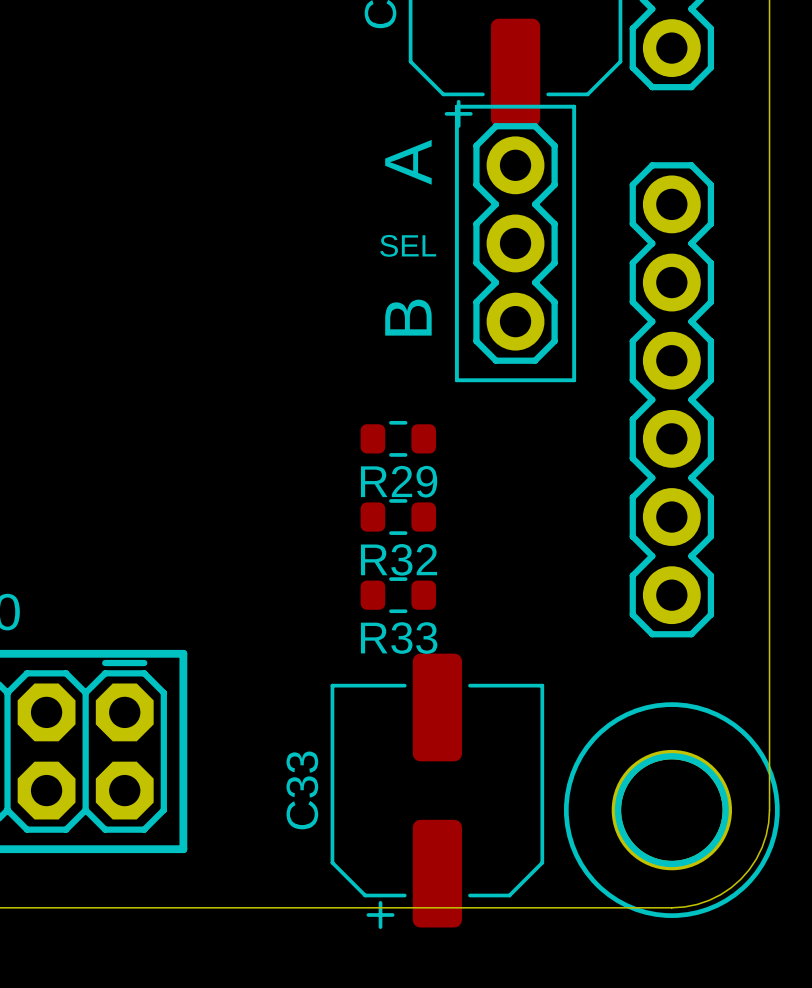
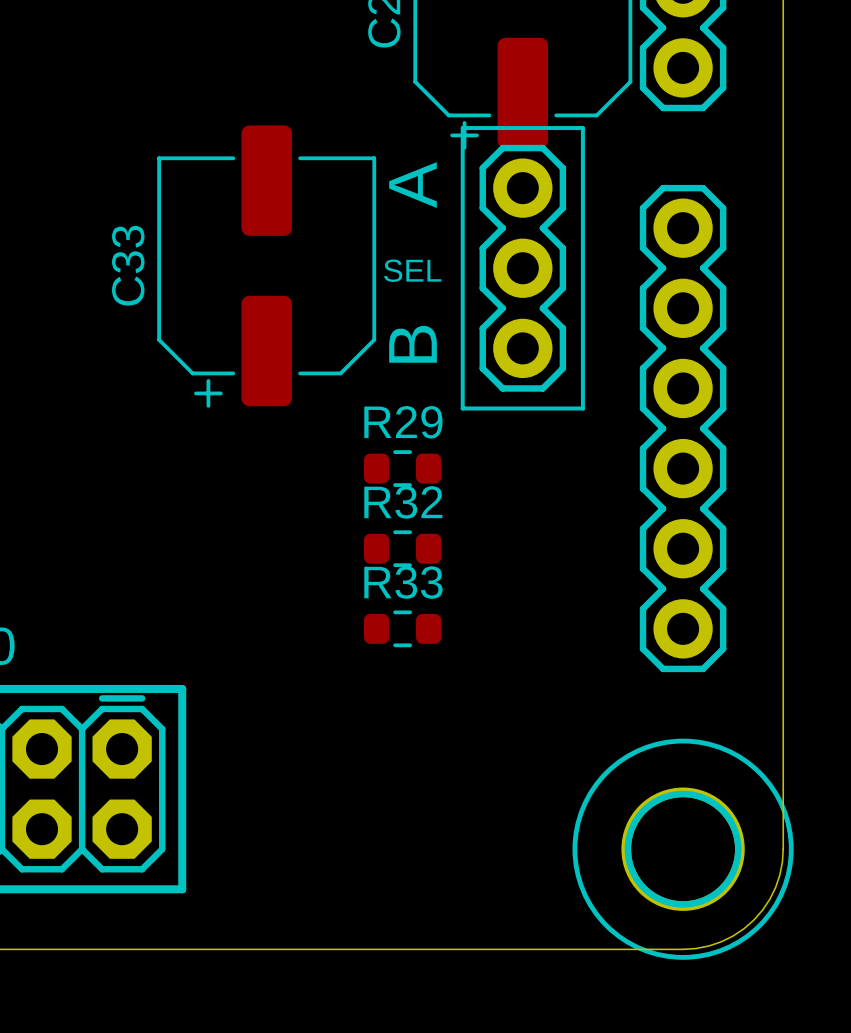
R29 name position: R29 (399, 481) -> R29 (403, 422)
R32 name position: R32 (399, 559) -> R32 (403, 502)
R33 name position: R33 (399, 638) -> R33 (403, 582)
C33 position: (437, 791) -> (266, 266)

